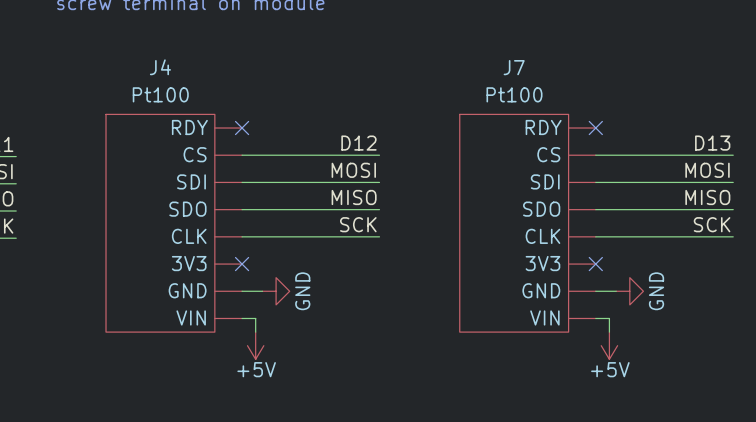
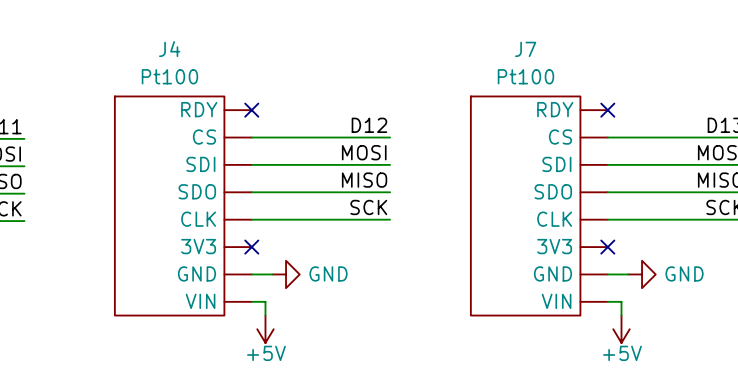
power symbol text rotation: 0° (302, 291) -> 90° clockwise (328, 273)
power symbol text rotation: 0° (656, 291) -> 90° clockwise (684, 273)

